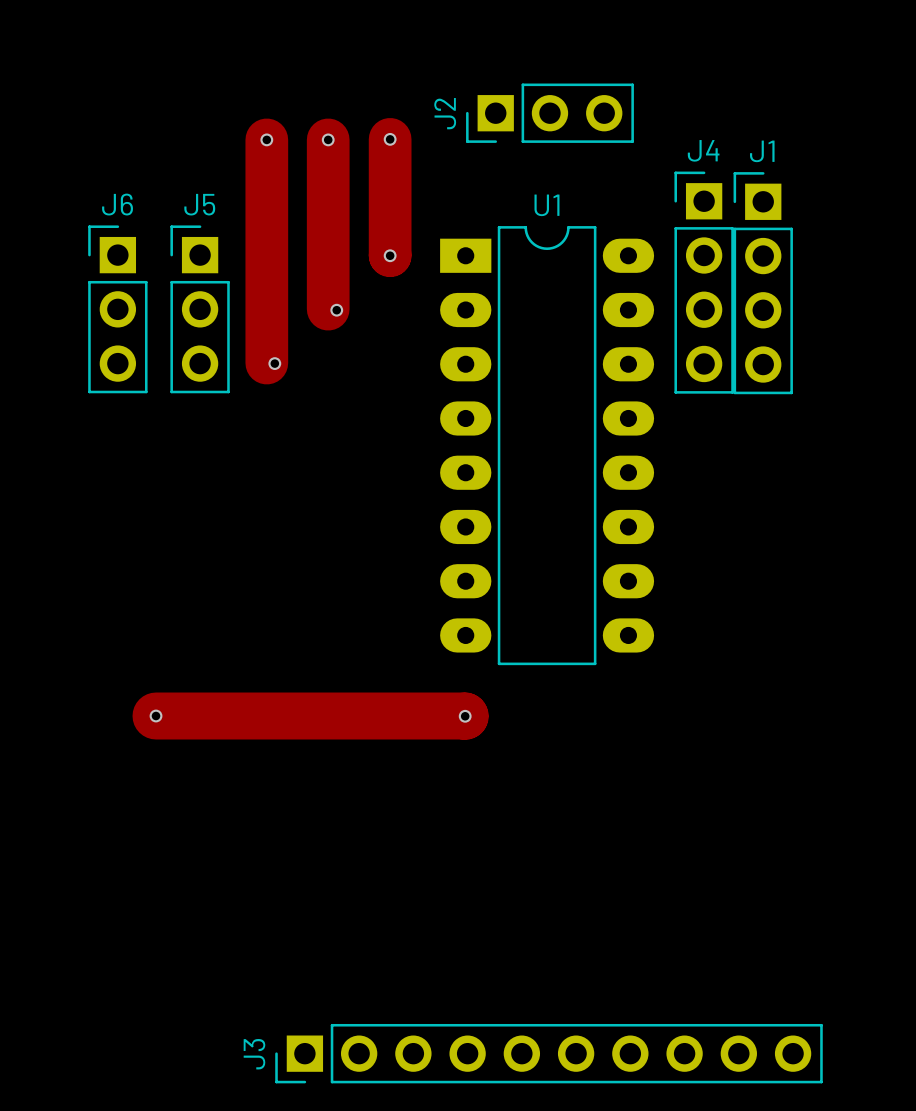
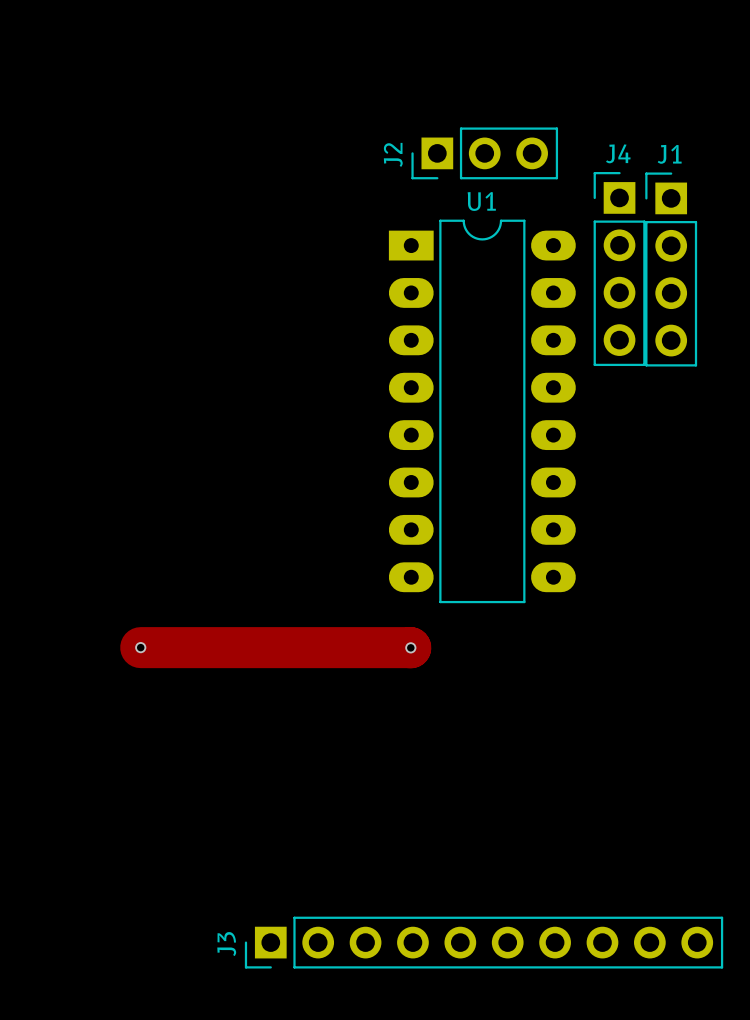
J2 position: (549, 113) -> (484, 153)
track: (266, 139) (266, 363) -> none
via: (266, 139) -> none
track: (328, 139) (328, 309) -> none
via: (328, 139) -> none
track: (390, 139) (390, 255) -> none
via: (390, 139) -> none
via: (390, 255) -> none
J6: (117, 309) -> none
J5: (200, 309) -> none
via: (336, 310) -> none
via: (274, 363) -> none

